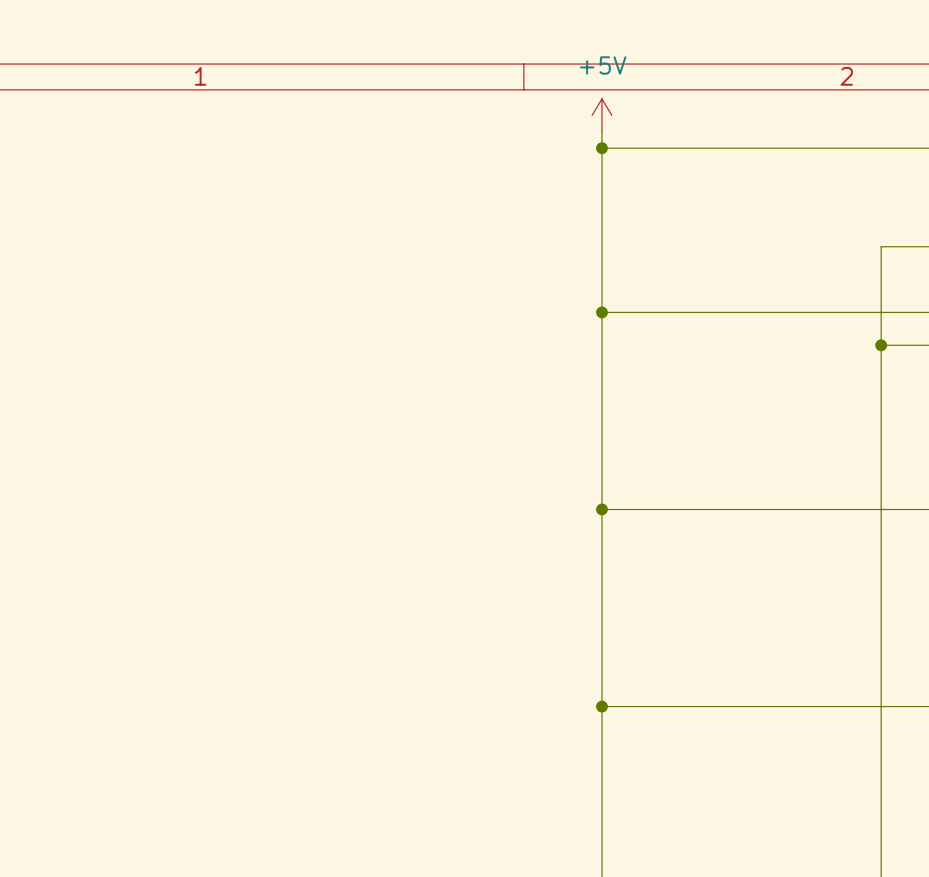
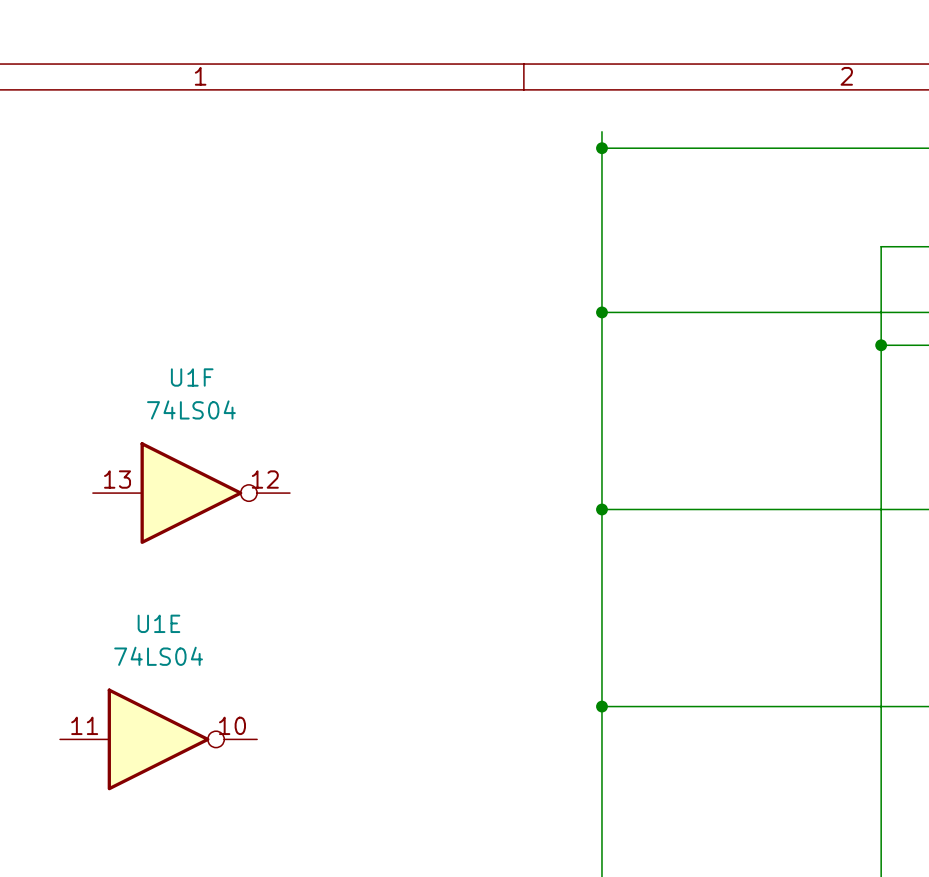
power symbol: +5V (601, 115) -> none
U1F: none -> 74LS04 (191, 493)
U1E: none -> 74LS04 (158, 739)

